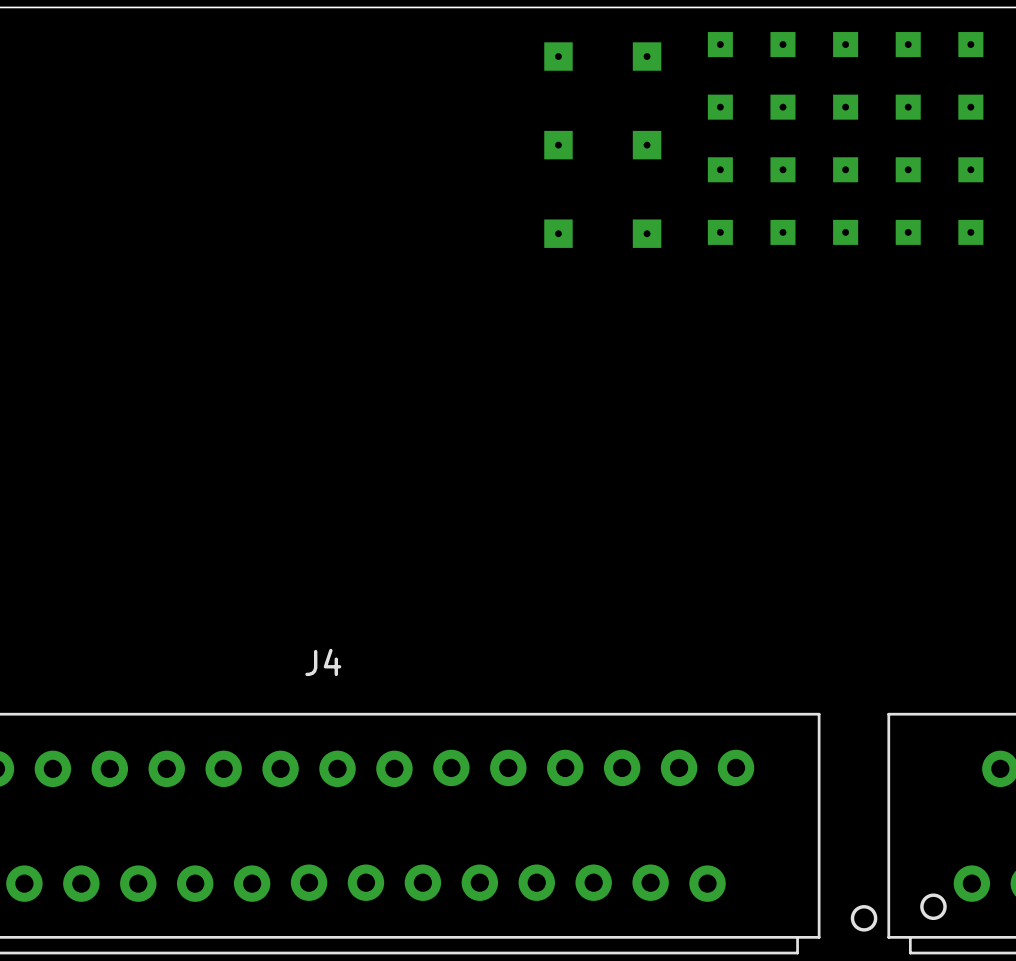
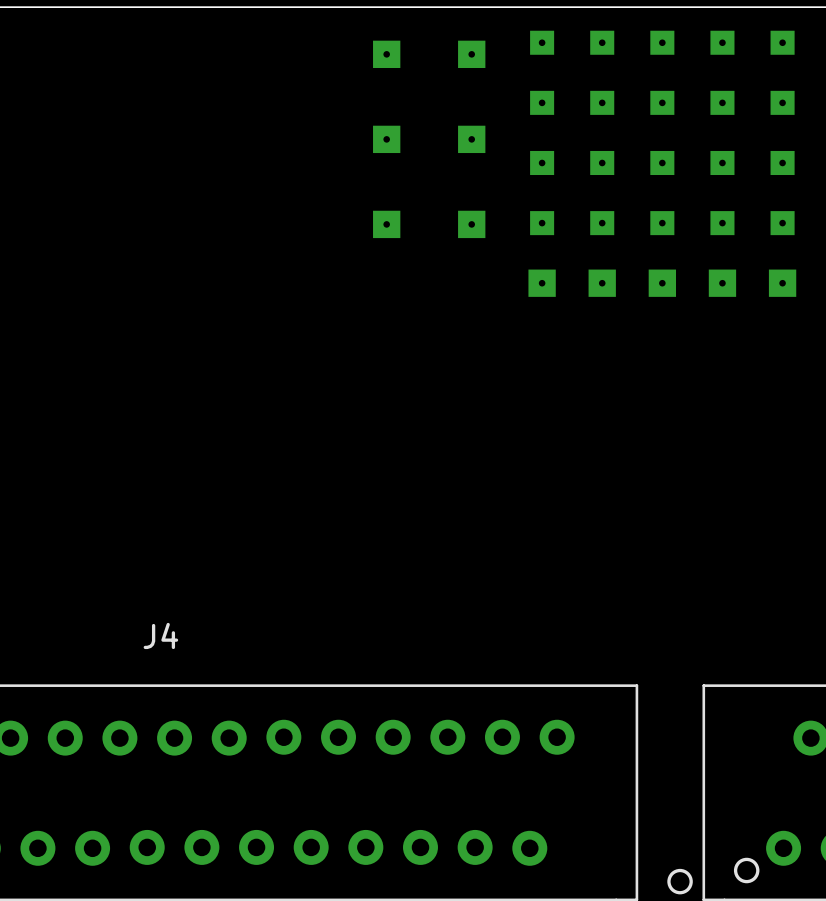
part: none -> (542, 283)
part: none -> (602, 283)
part: none -> (662, 283)
part: none -> (722, 283)
part: none -> (782, 283)

